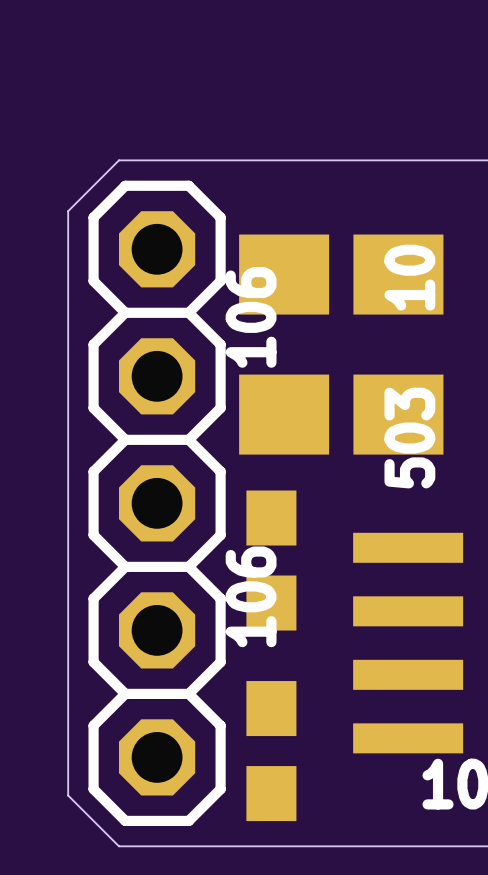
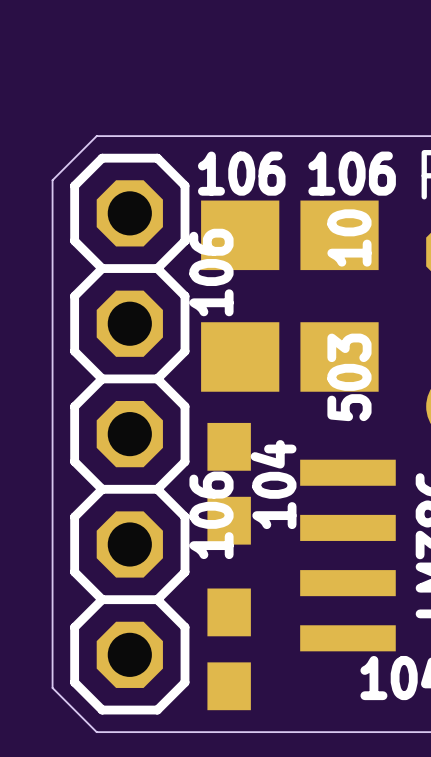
text: none -> 106 (241, 173)
text: none -> 106 (352, 173)
text: none -> 104 (273, 484)

